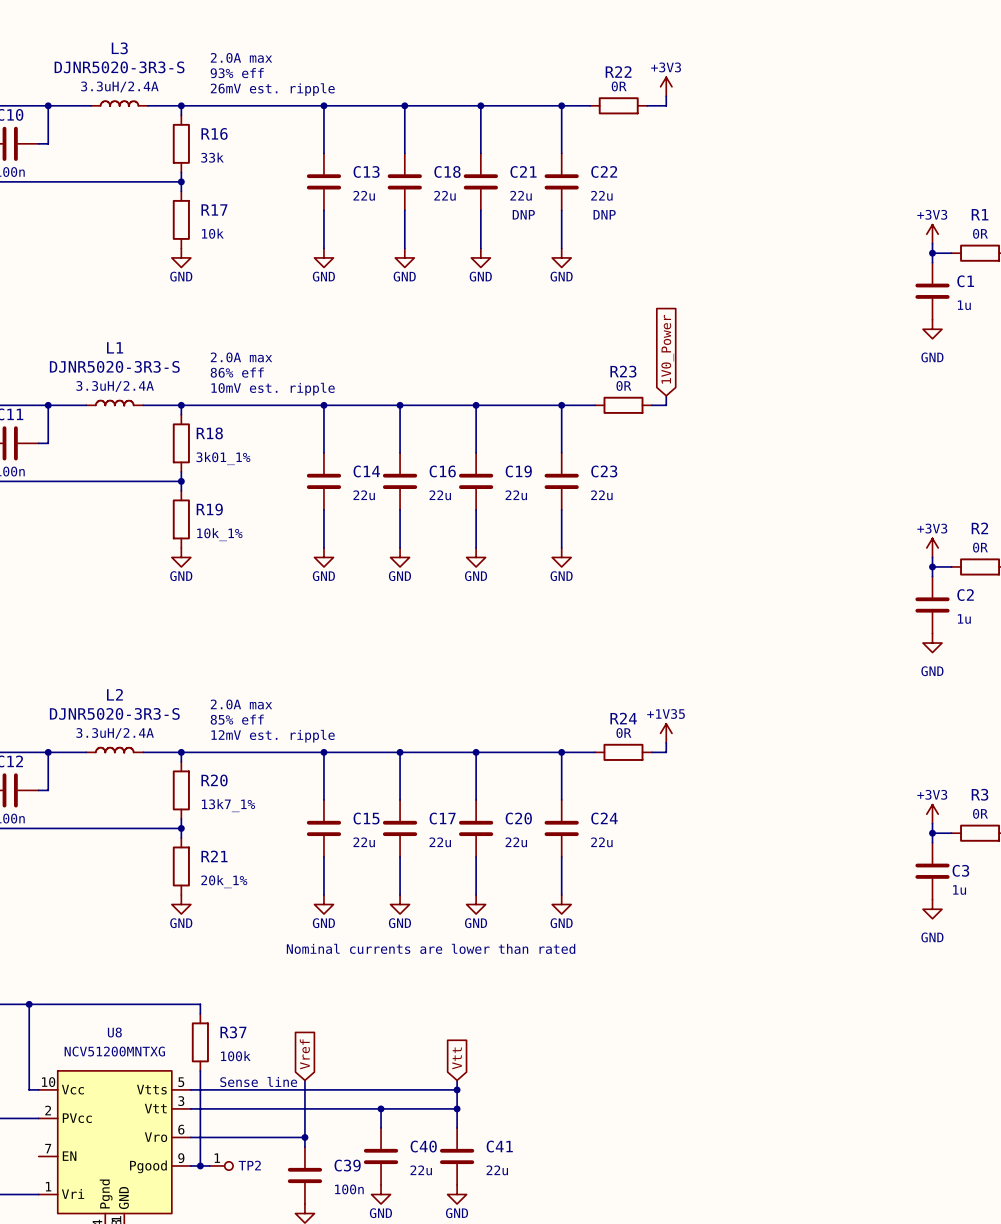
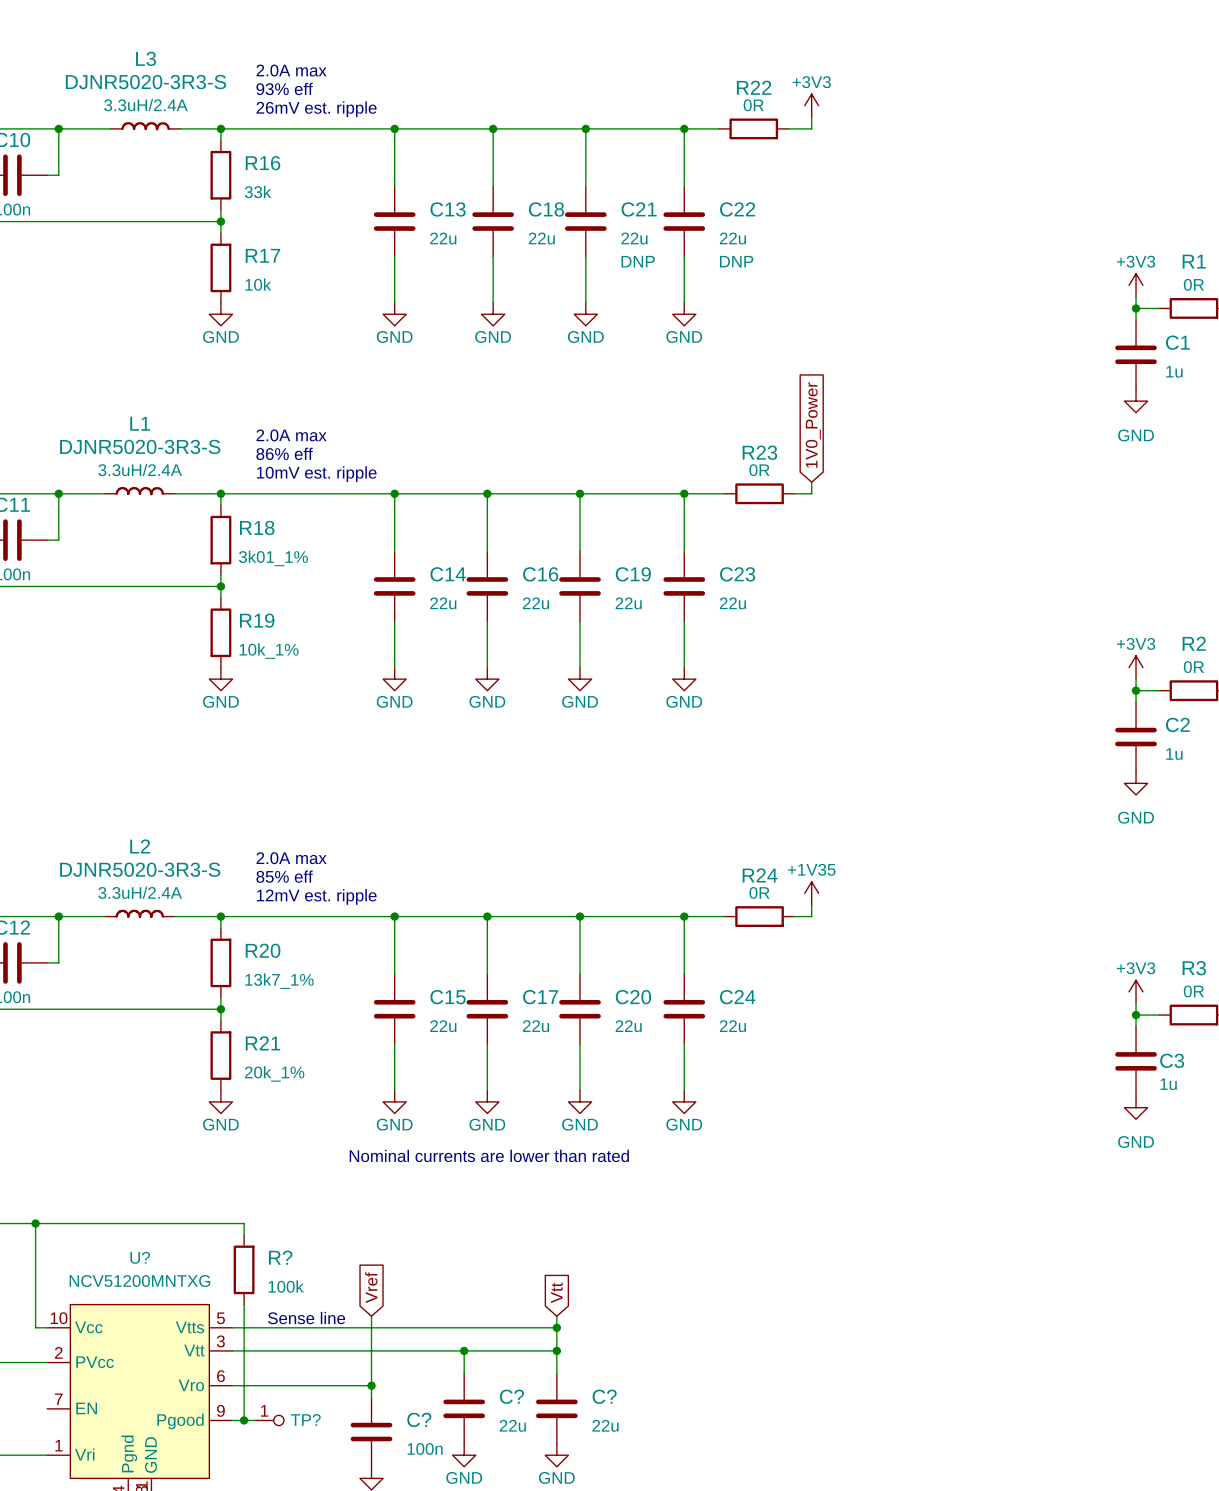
U8 name: U8 (114, 1032) -> U? (140, 1257)
R37 name: R37 (233, 1032) -> R? (280, 1257)
C40 name: C40 (423, 1146) -> C? (511, 1396)
C41 name: C41 (499, 1146) -> C? (604, 1396)
TP2 name: TP2 (249, 1165) -> TP? (305, 1419)
C39 name: C39 (347, 1165) -> C? (419, 1419)

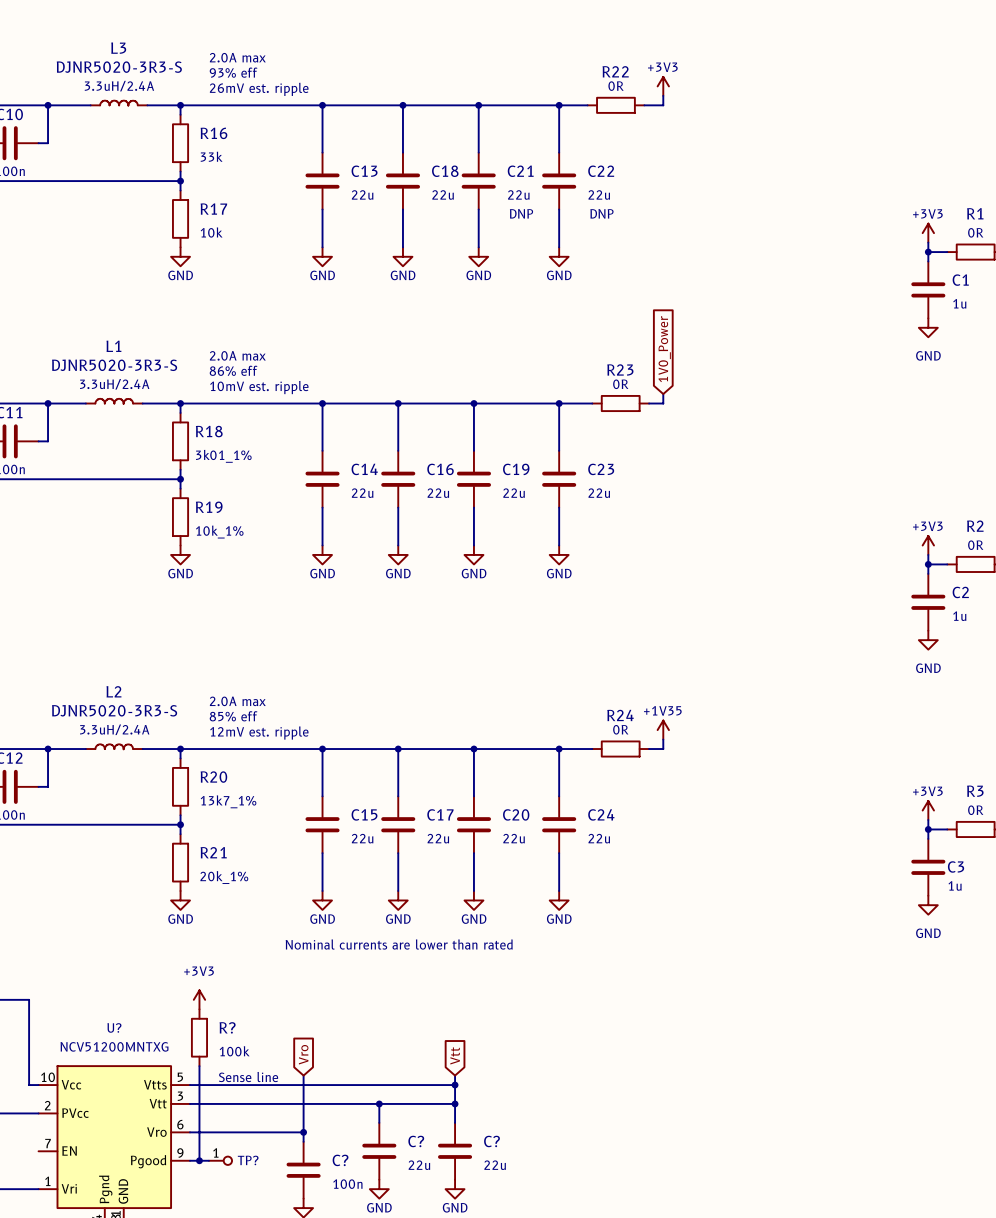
wire: (35, 1223) (244, 1223) (244, 1235) -> none
junction: (35, 1223) -> none
power symbol: none -> +3V3 (199, 999)
global label: Vref (371, 1287) -> Vro (303, 1054)

